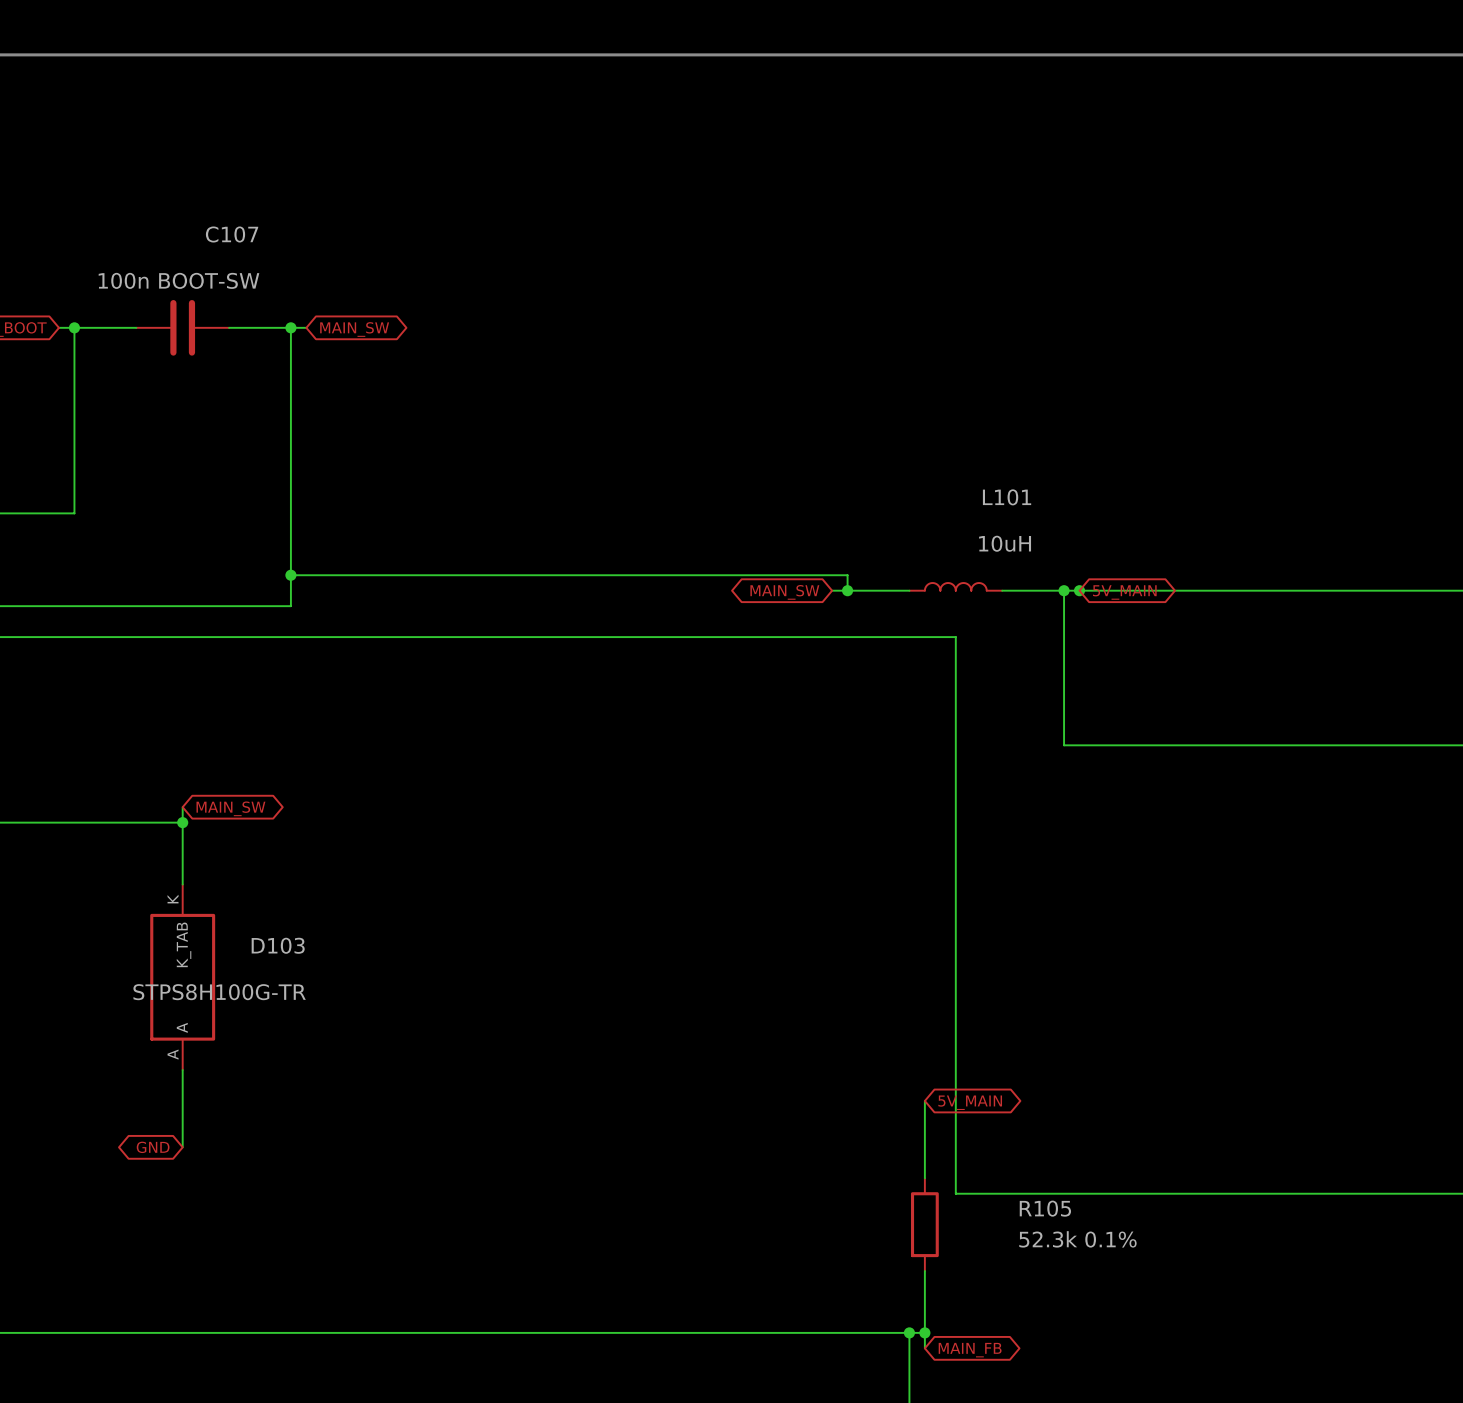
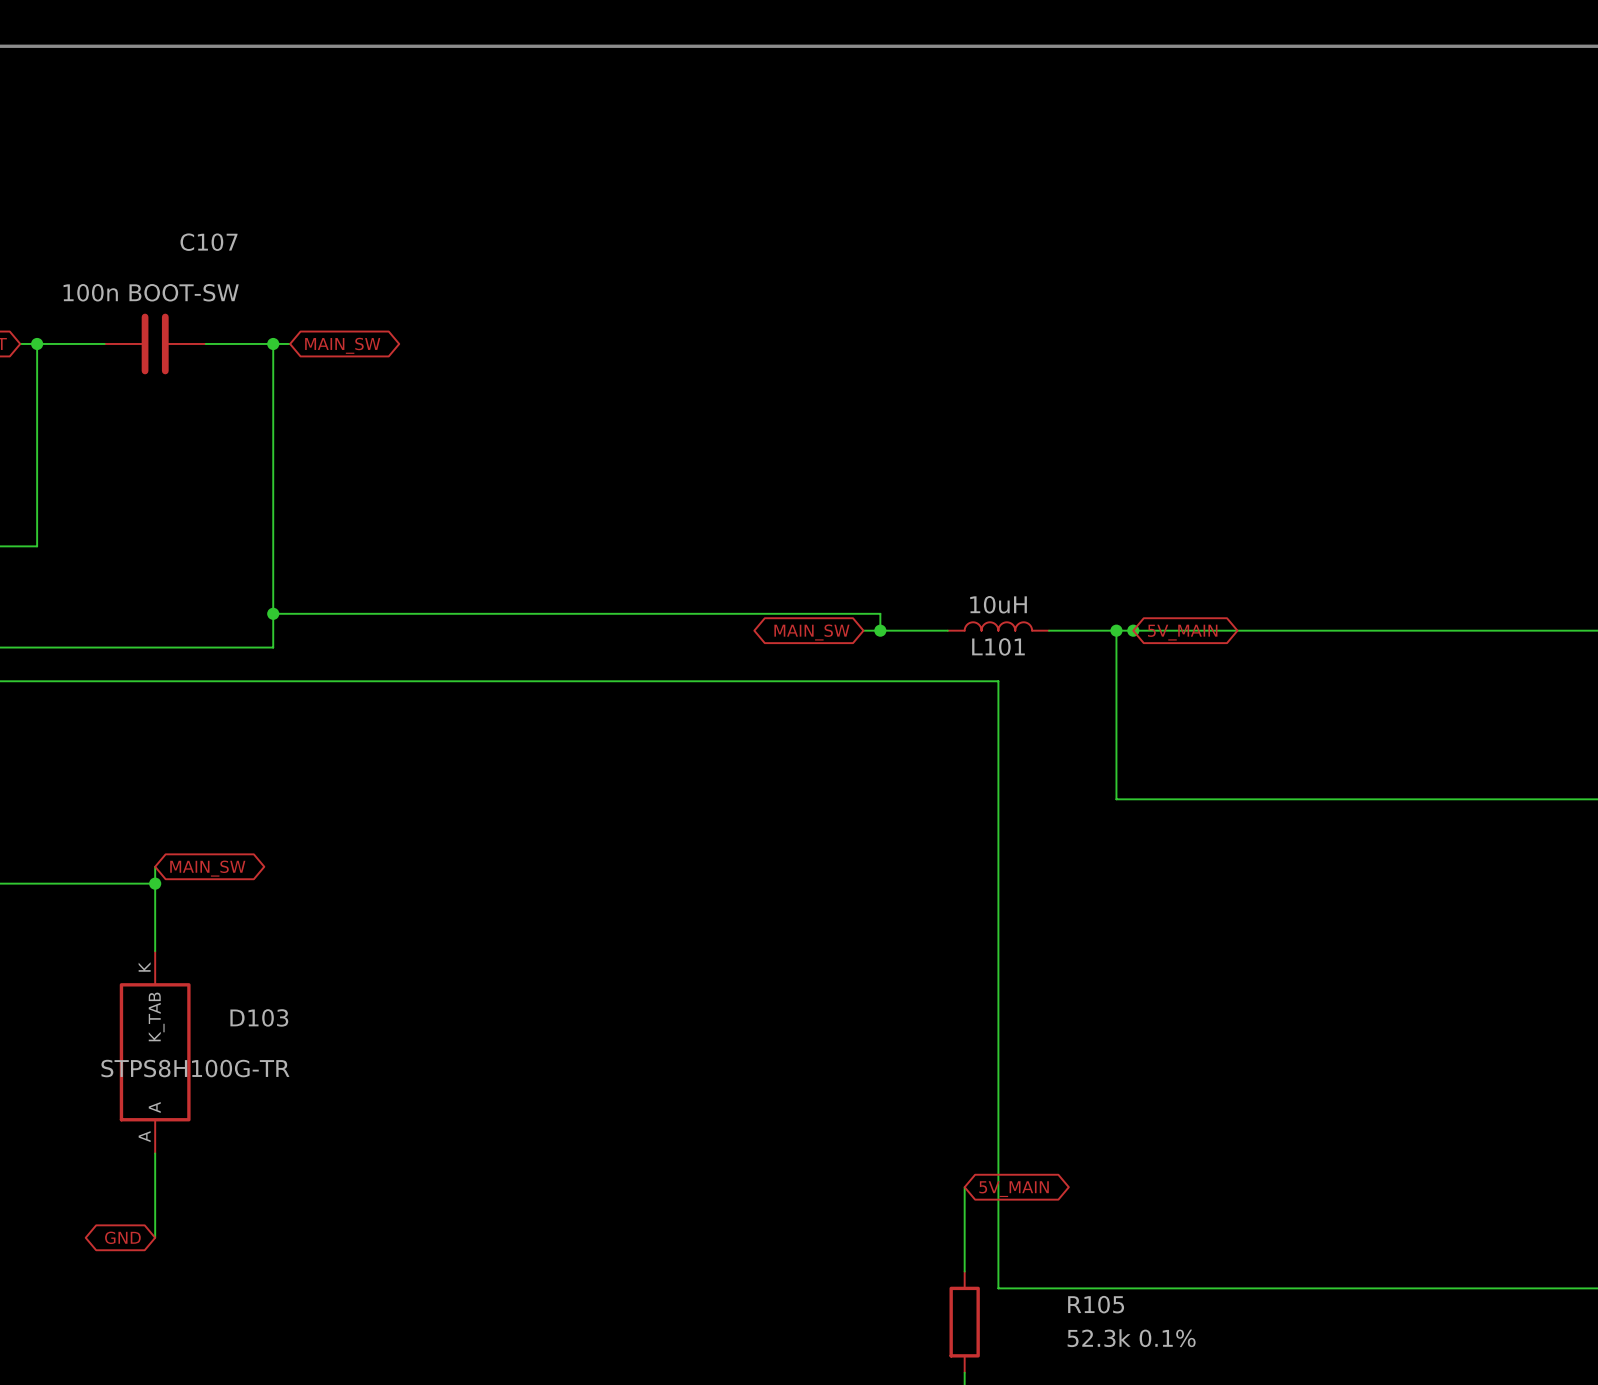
L101 name position: L101 (1007, 497) -> L101 (998, 646)
L101 value position: 10uH (1005, 543) -> 10uH (998, 604)

